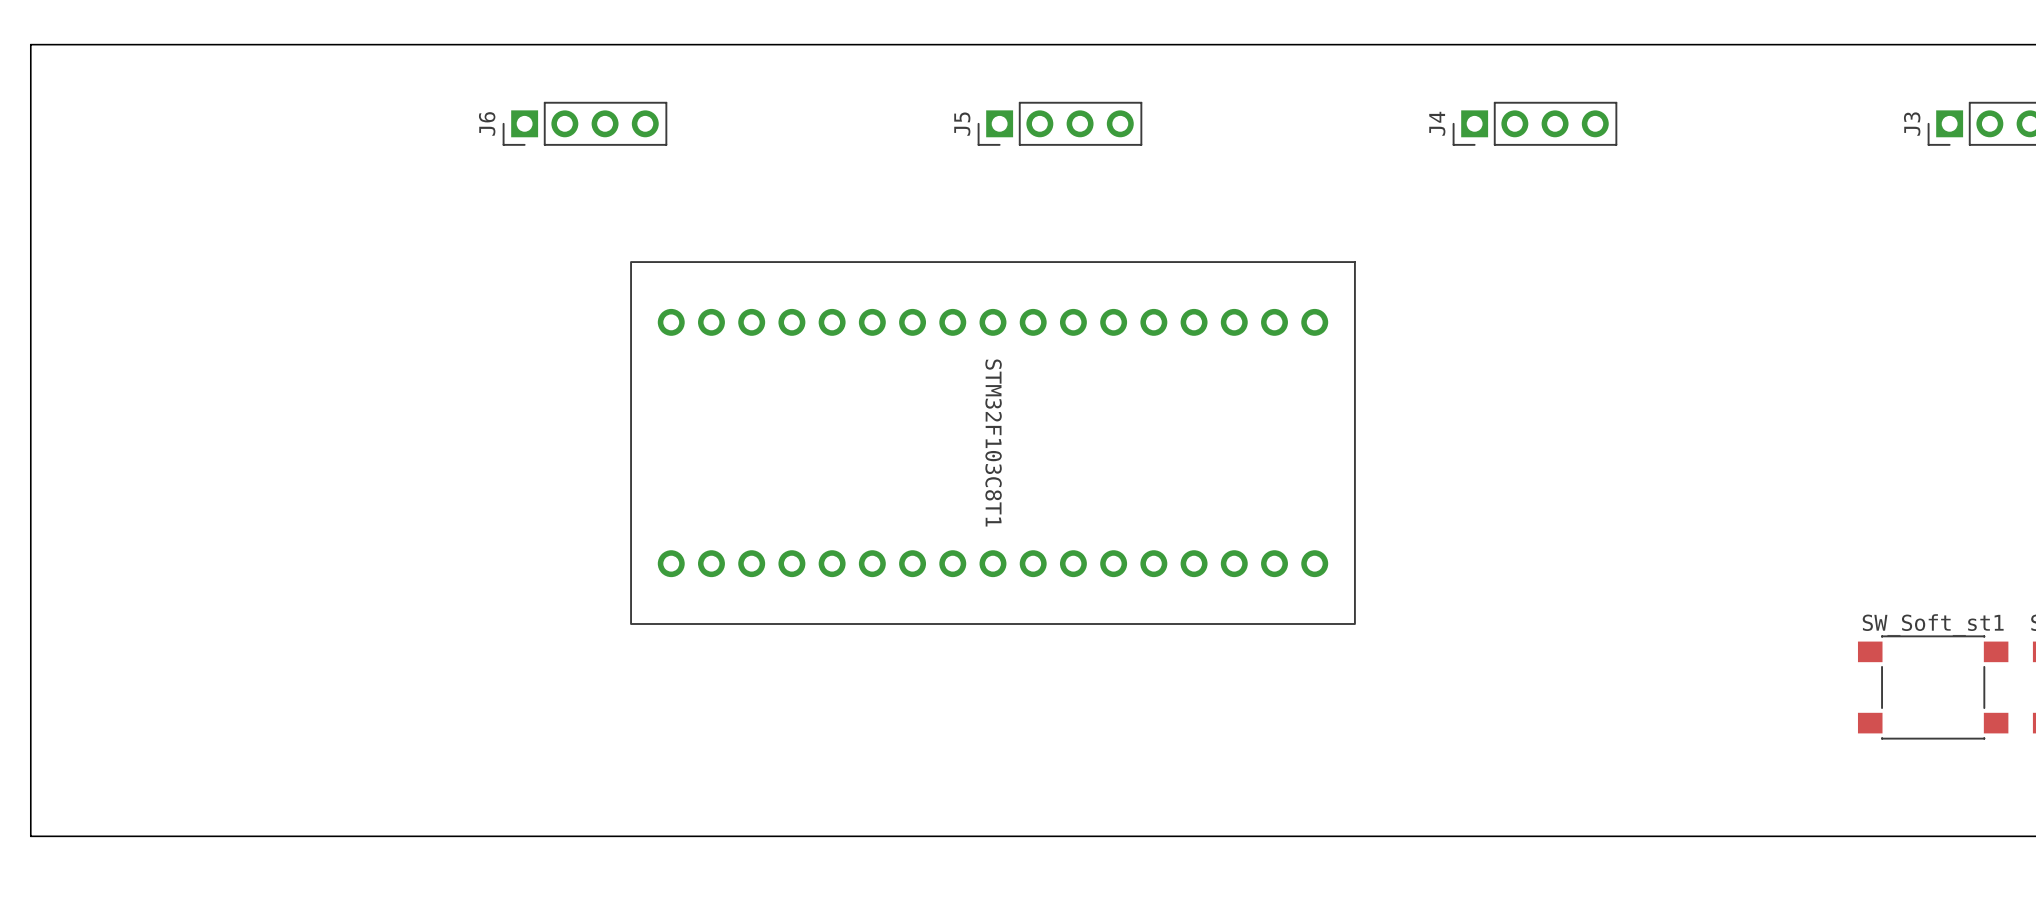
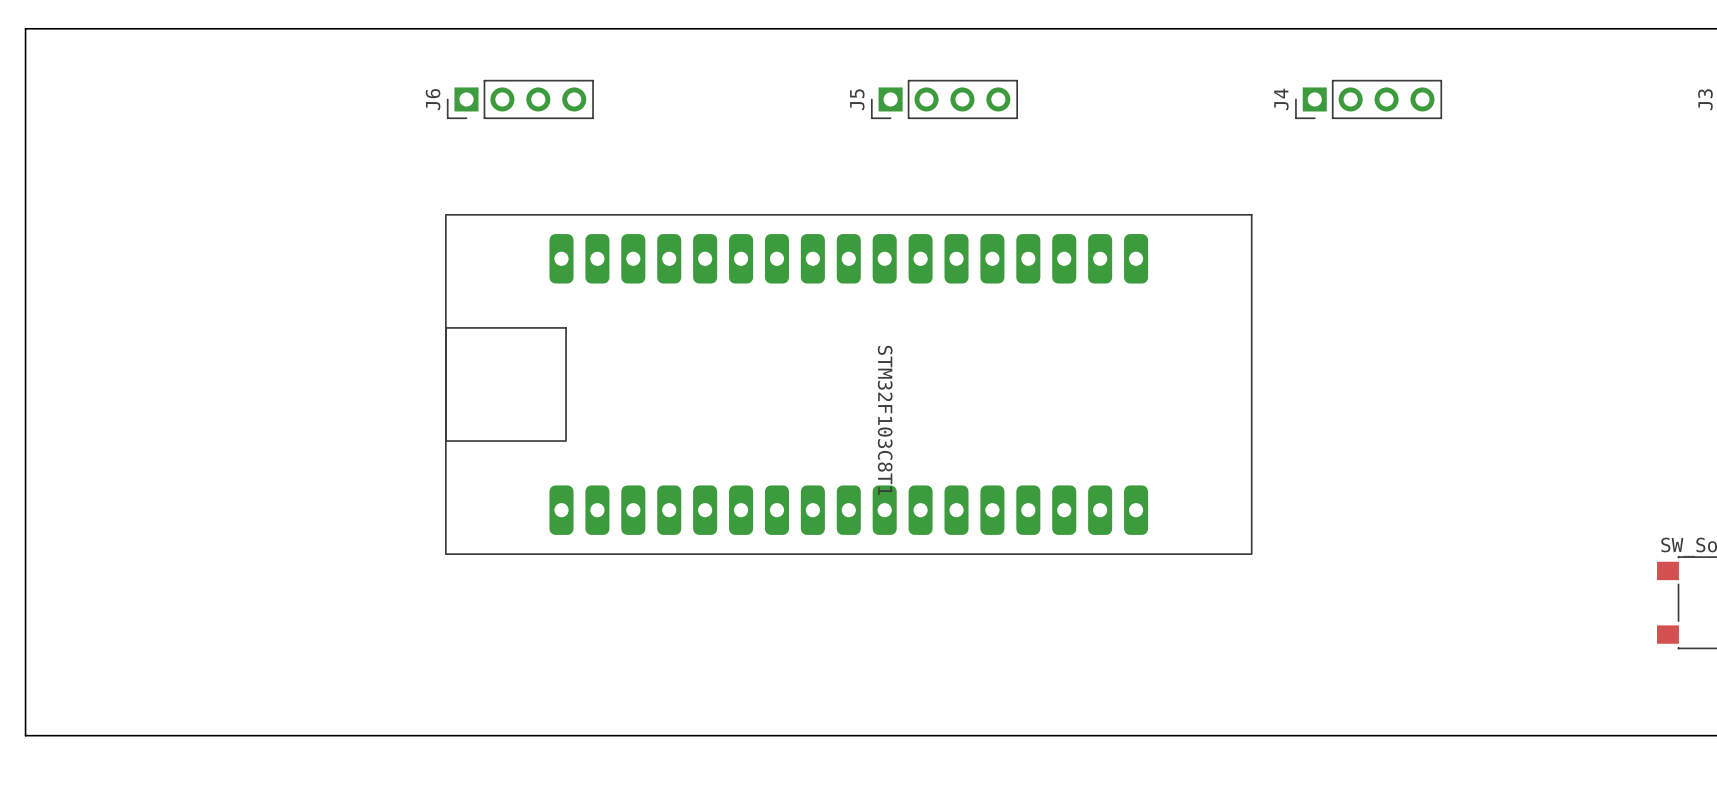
STM32F103C8T1 footprint: [630, 261, 1356, 625] -> [445, 213, 1253, 555]
STM32F103C8T1 name position: STM32F103C8T1 (993, 443) -> STM32F103C8T1 (885, 420)

